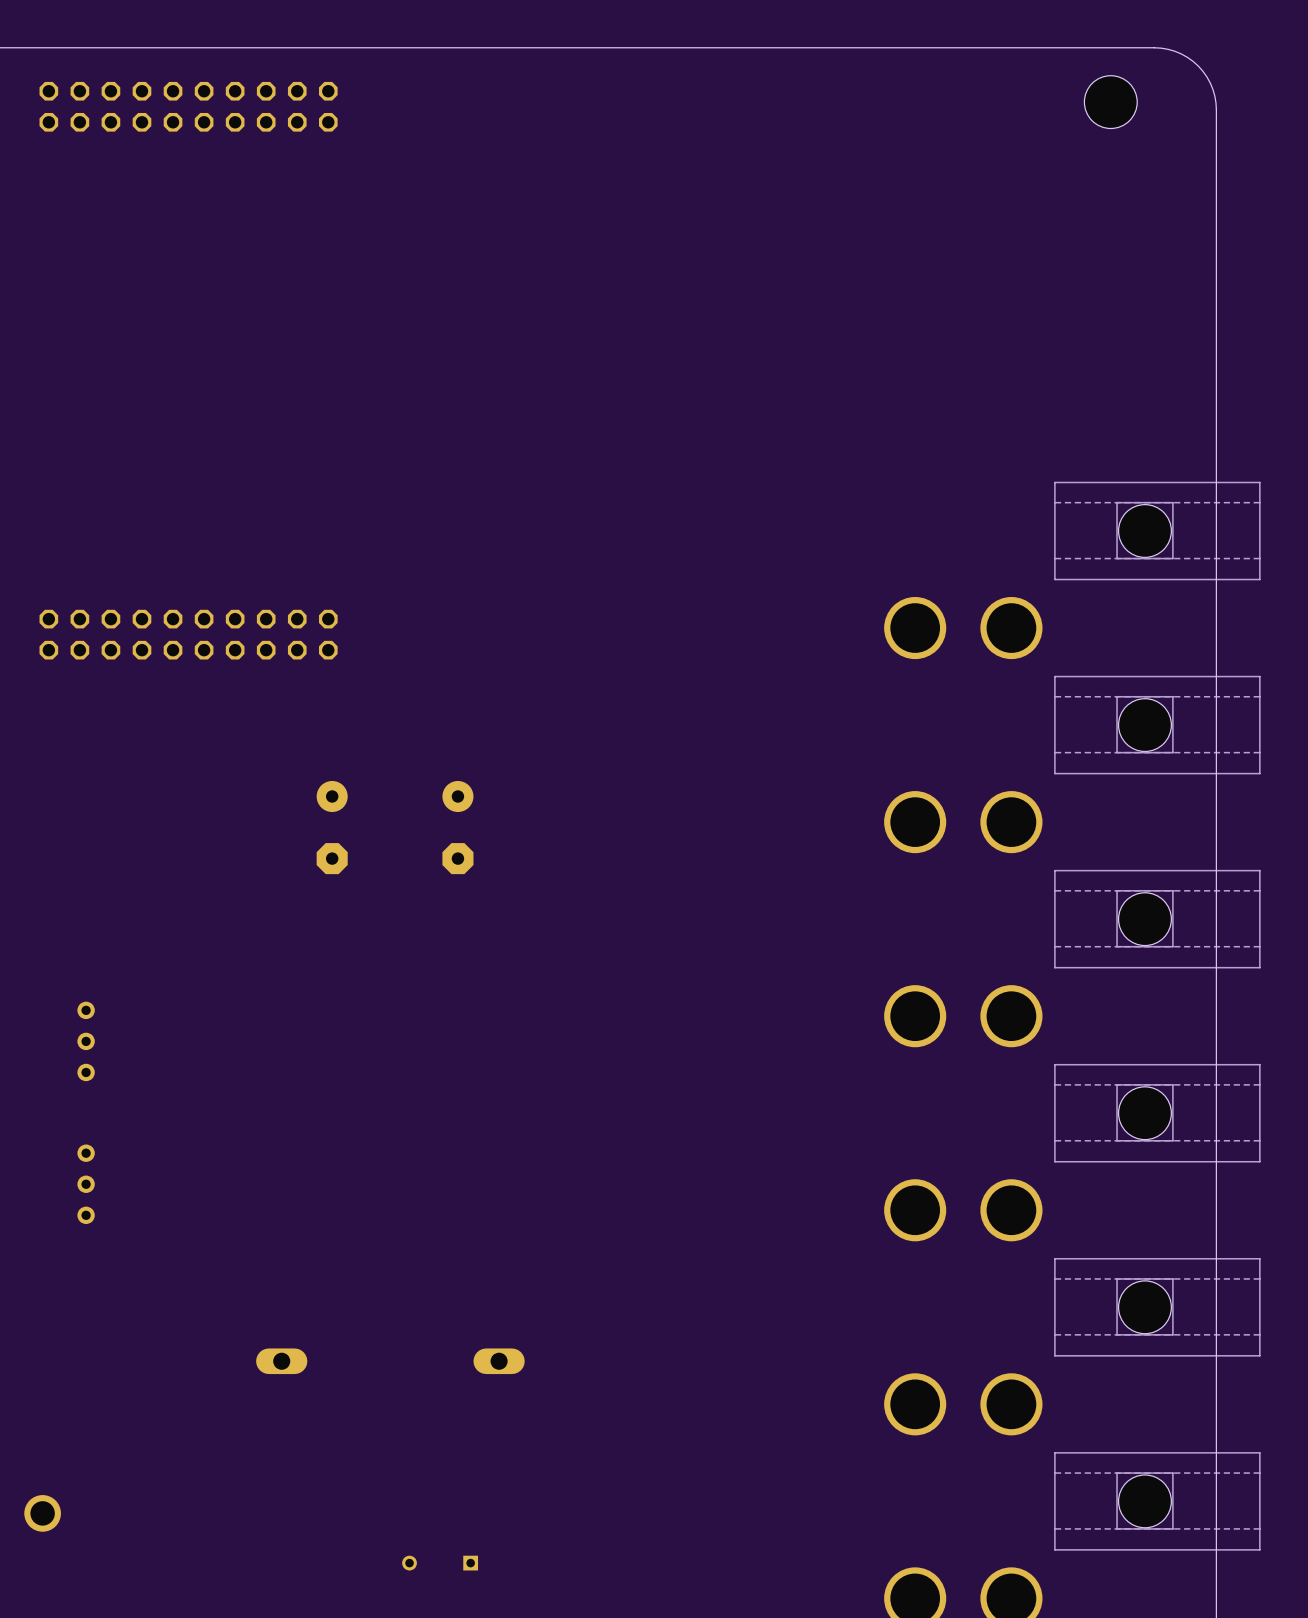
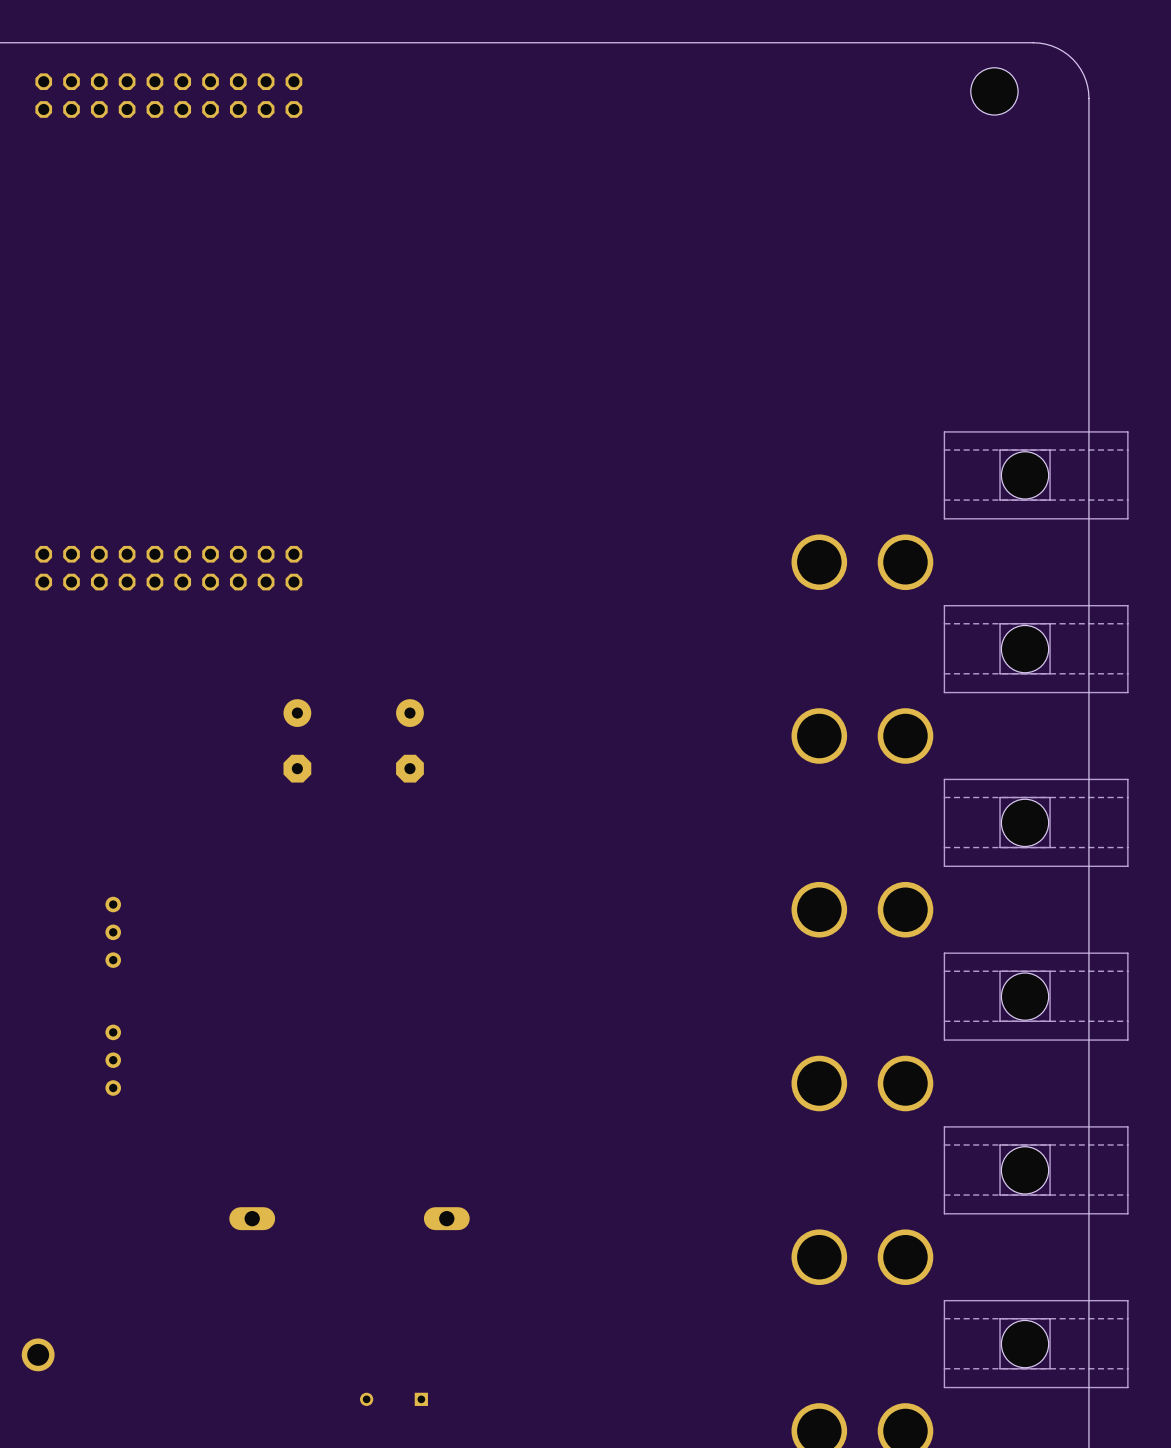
part position: (86, 1041) -> (113, 932)
part position: (86, 1184) -> (113, 1060)

